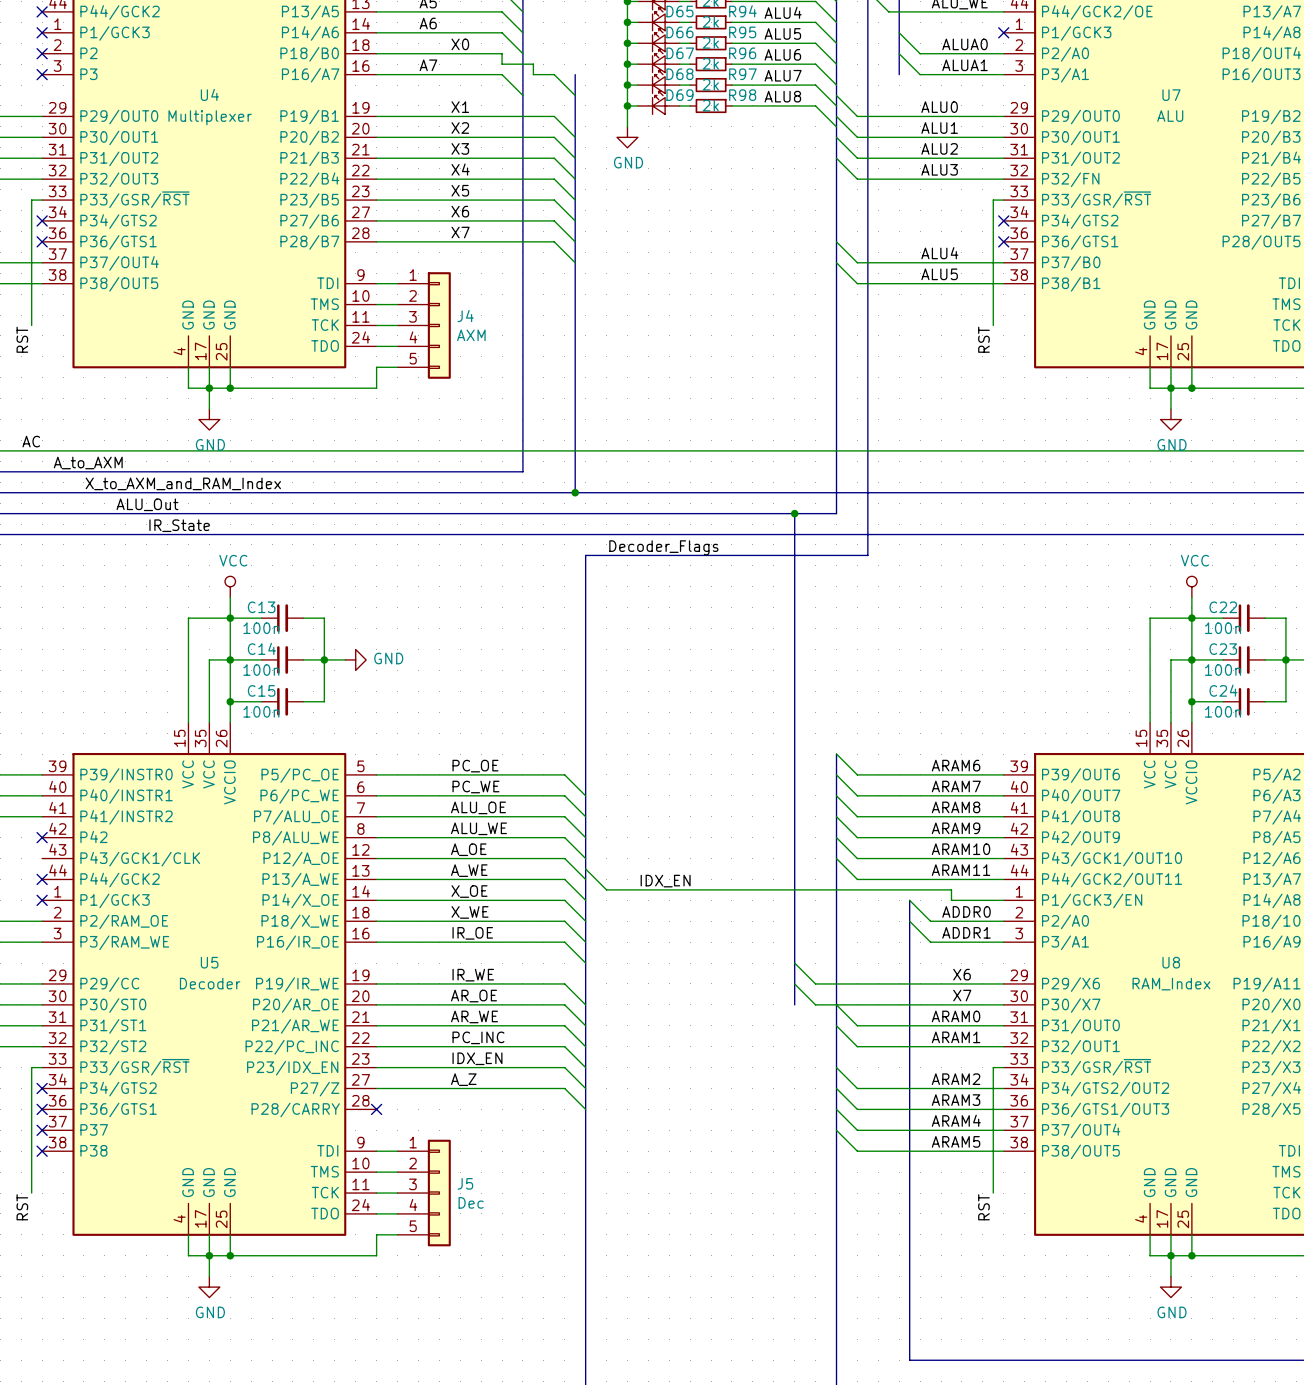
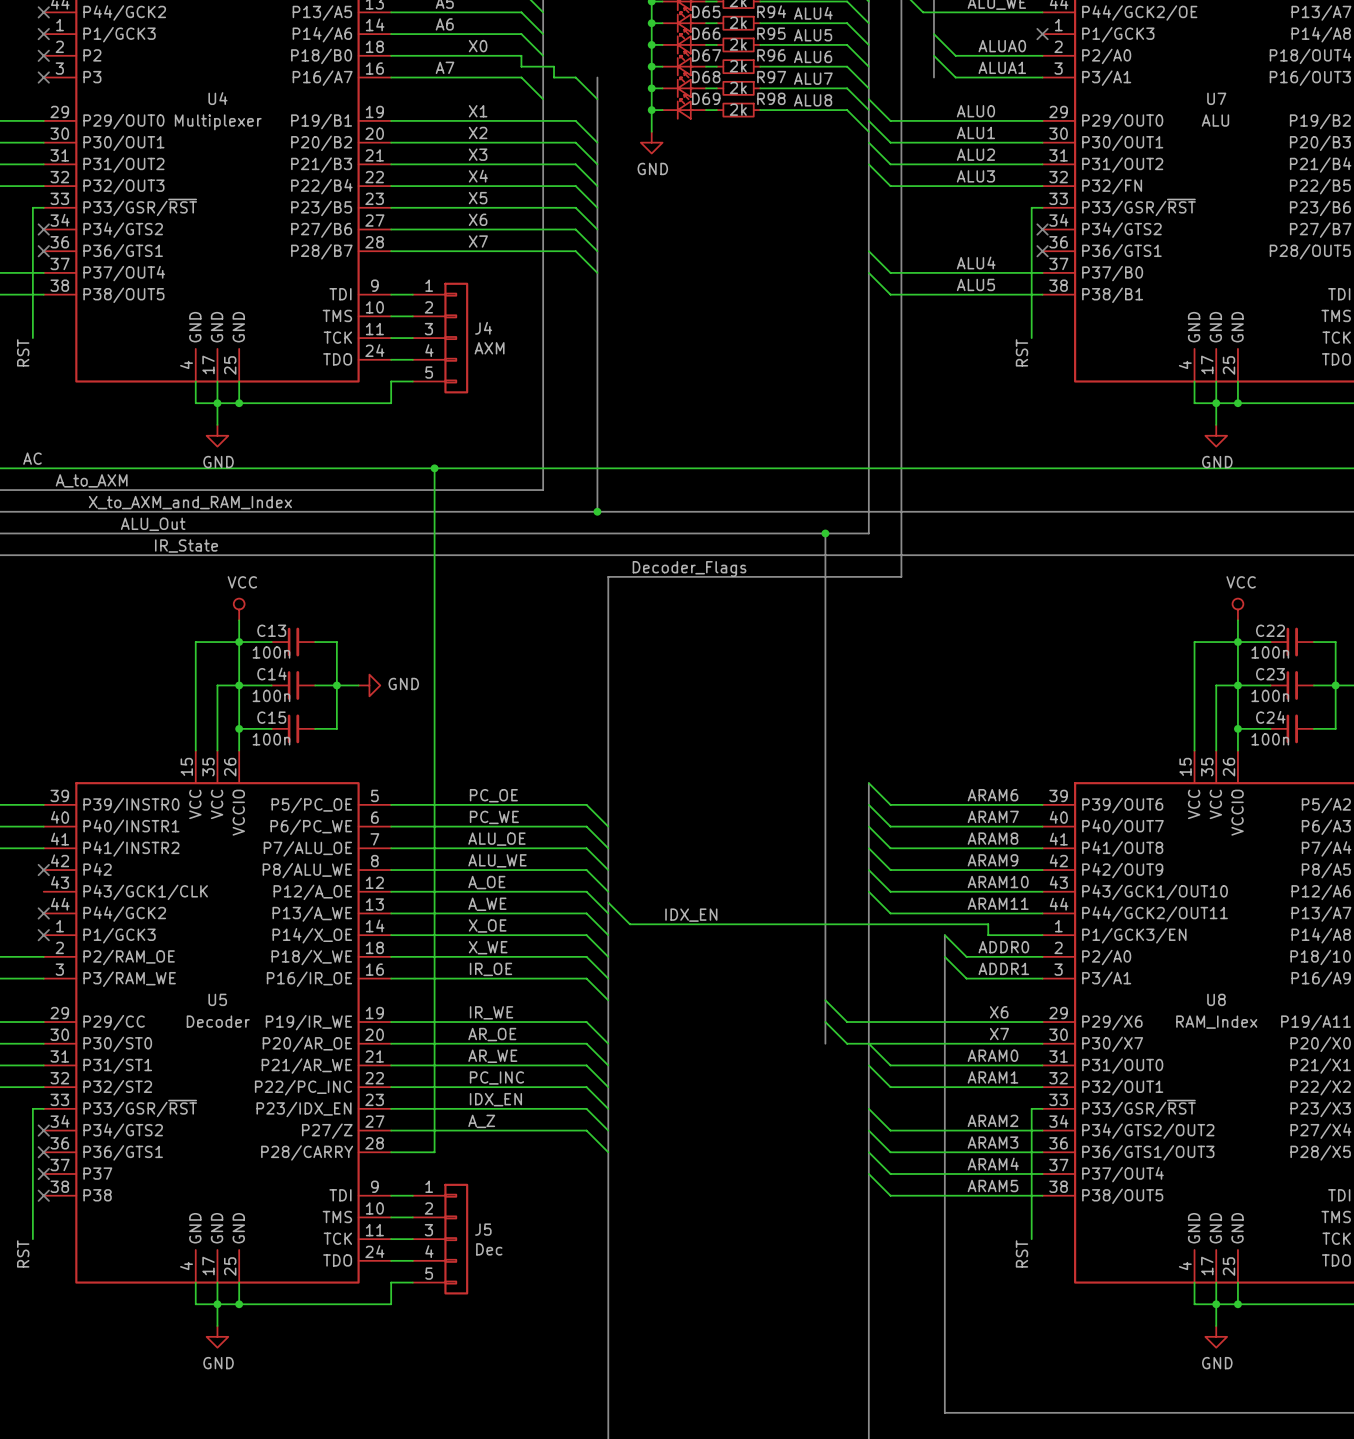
wire: none -> (434, 468) (434, 1152) (391, 1152)
junction: none -> (434, 468)
no-connect mark: (376, 1109) -> none

